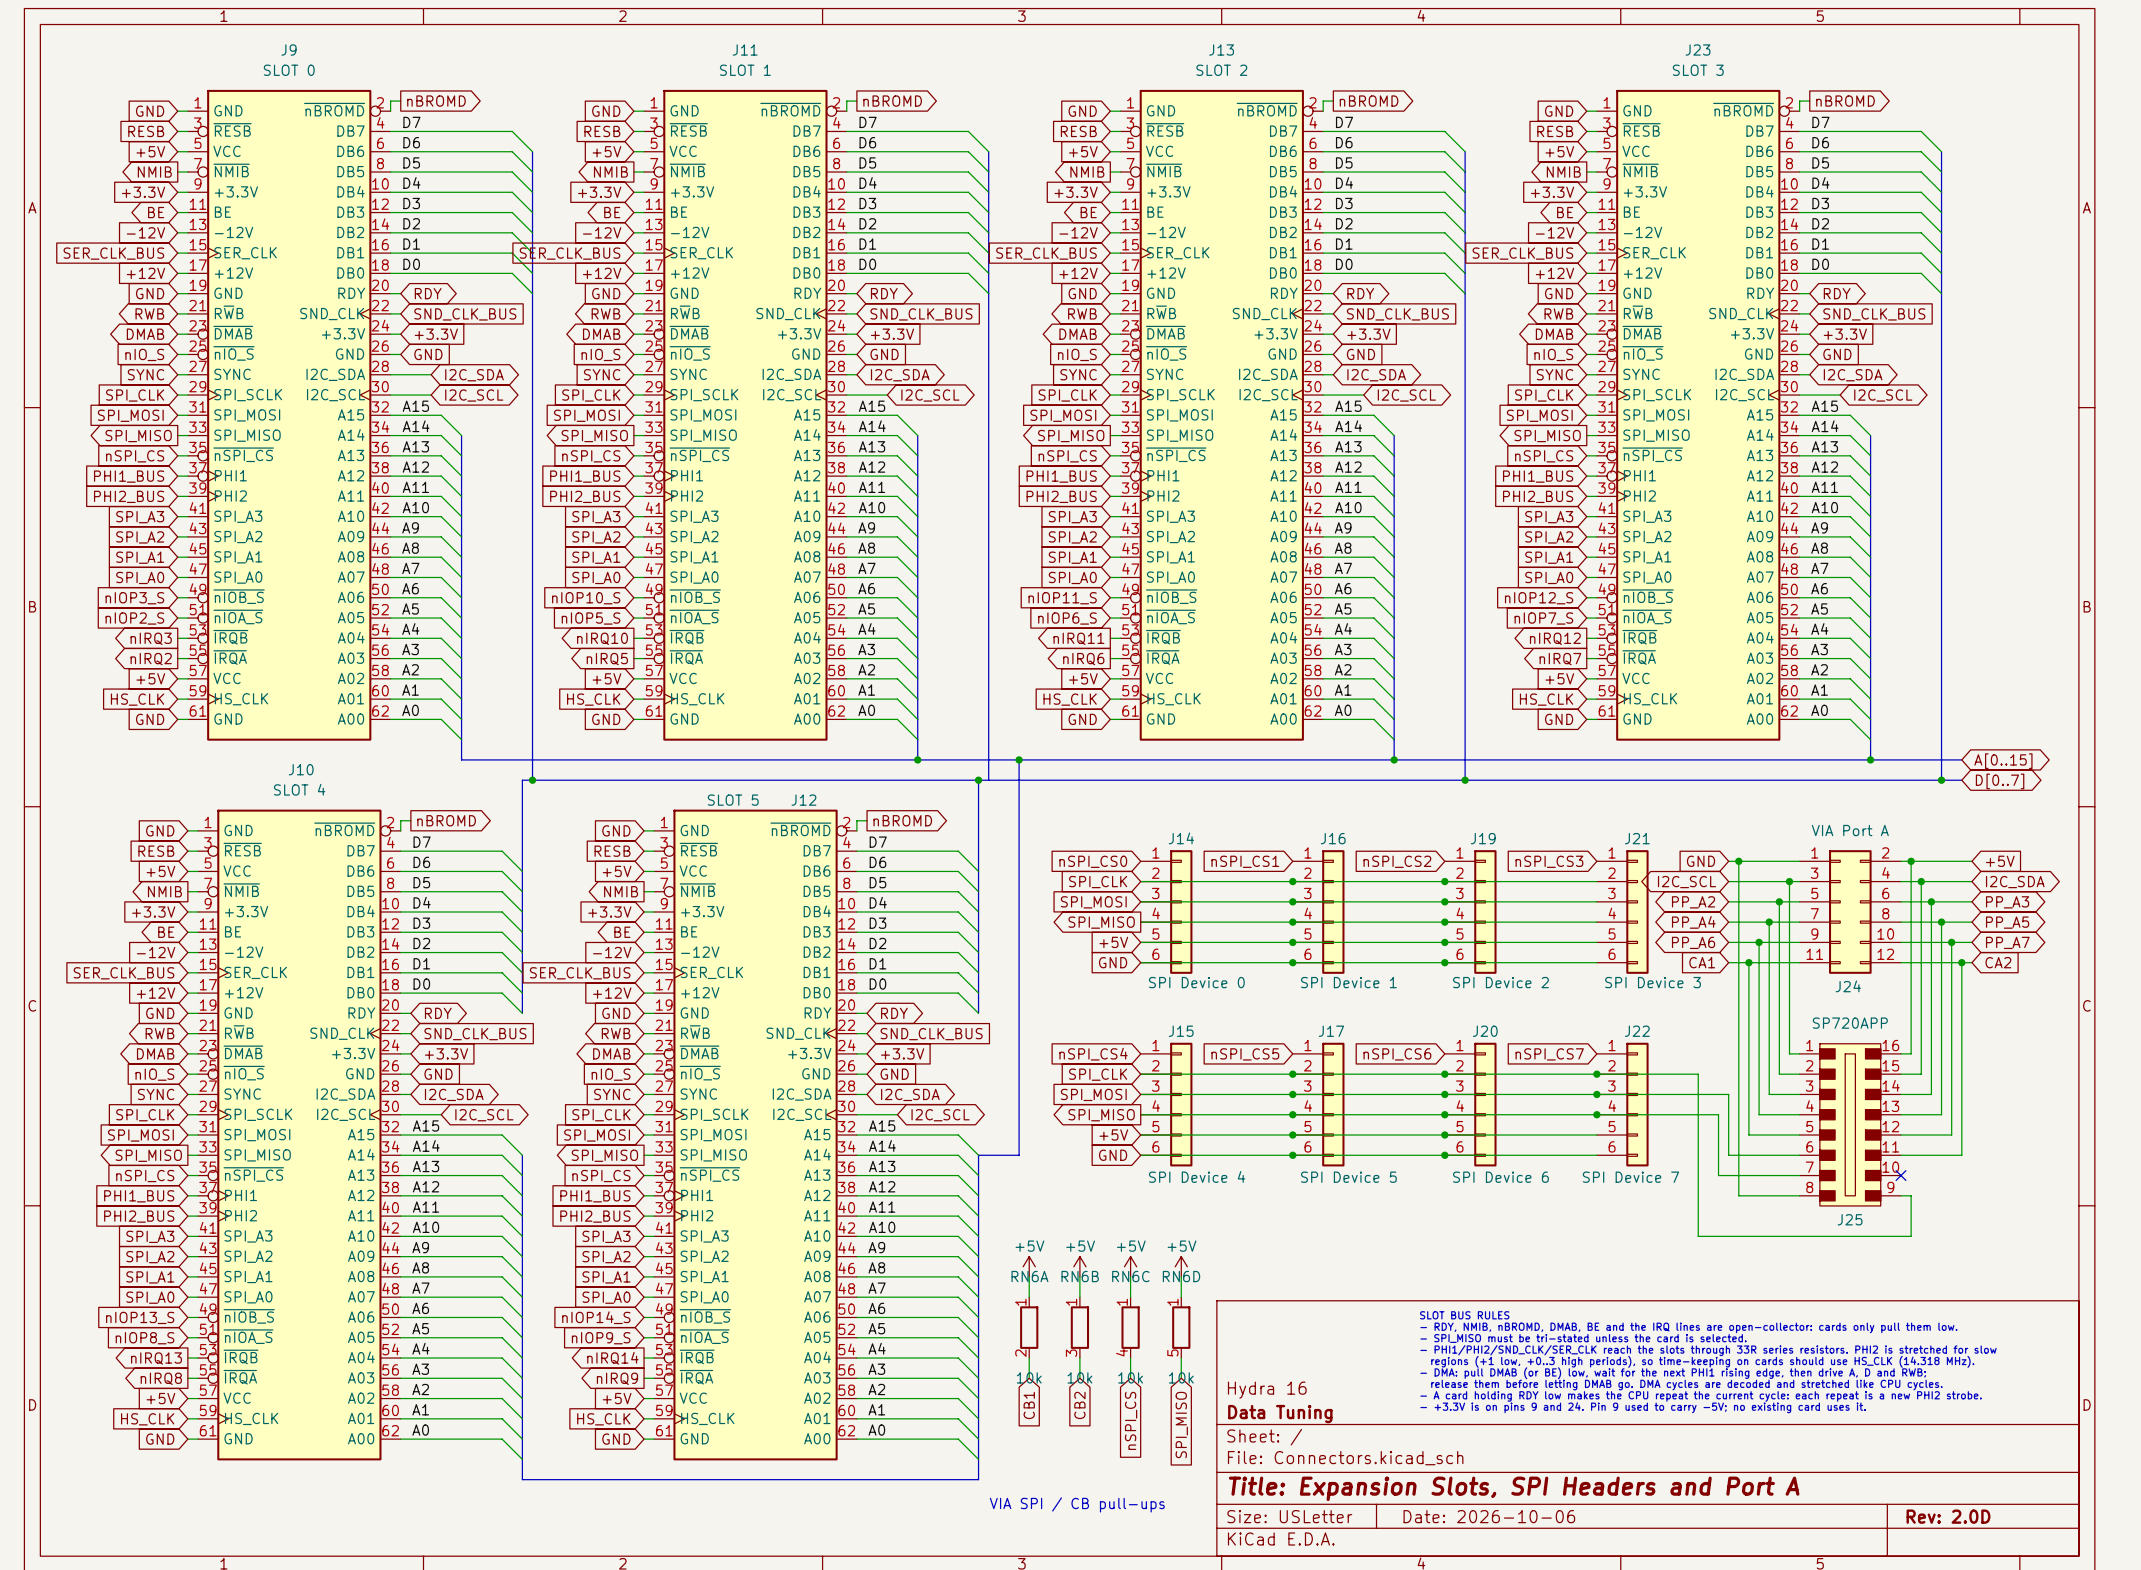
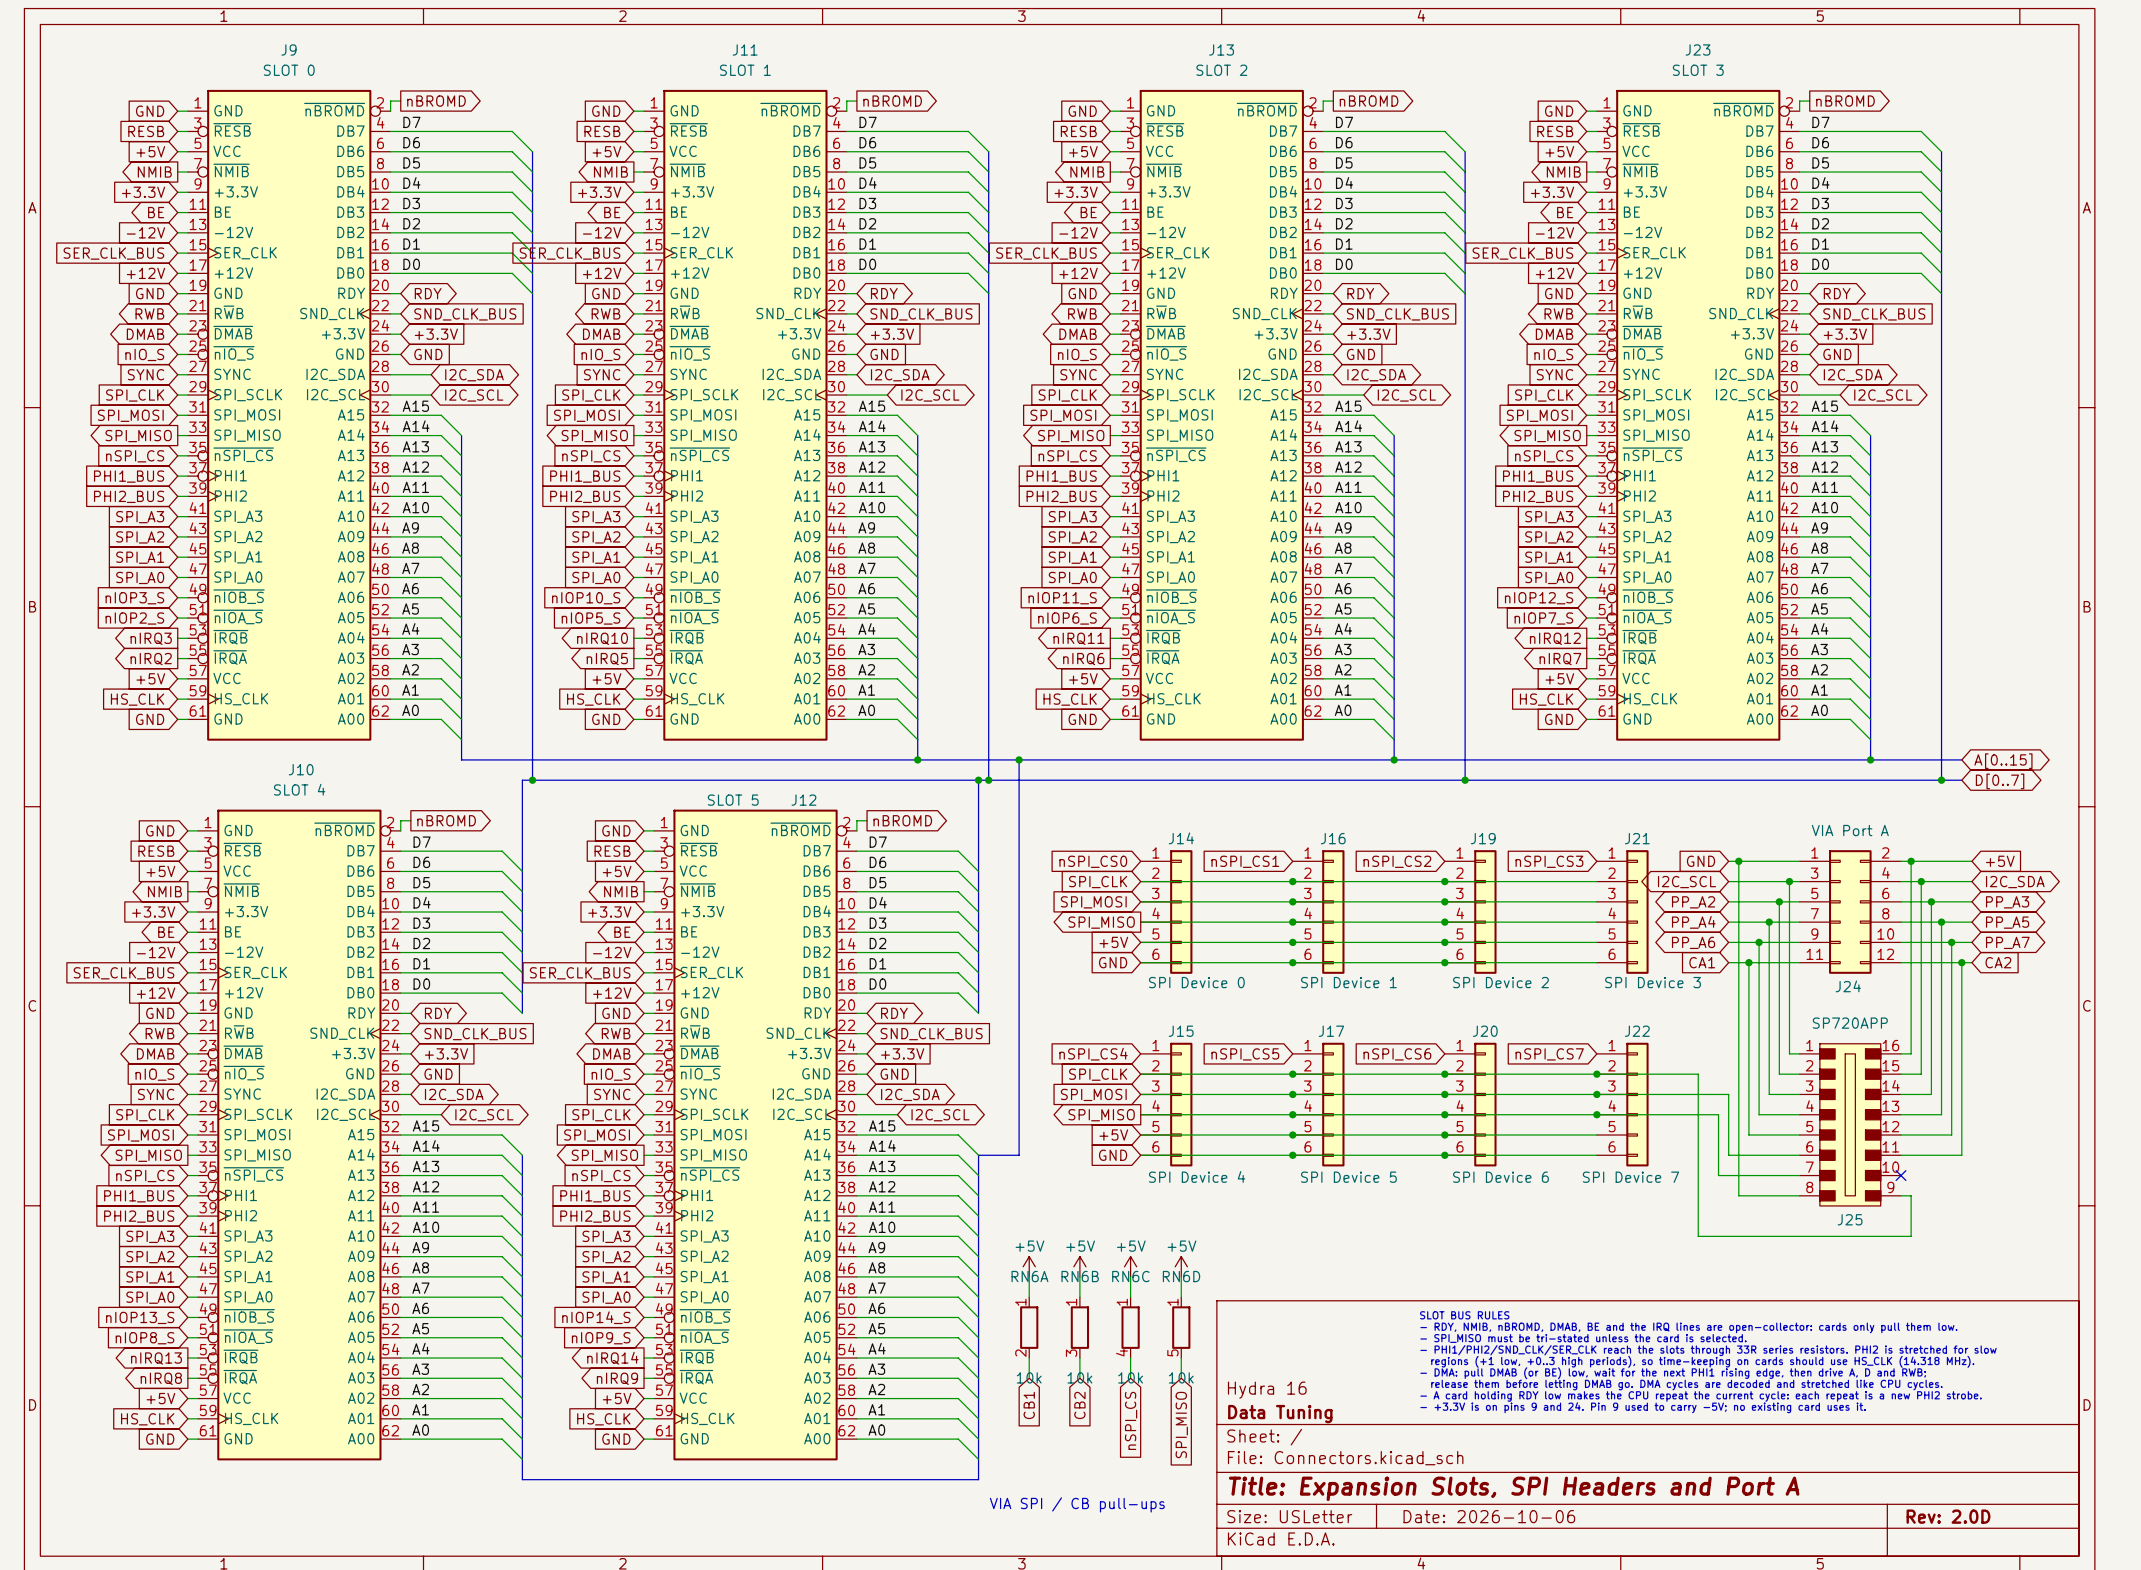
junction: none -> (988, 780)

